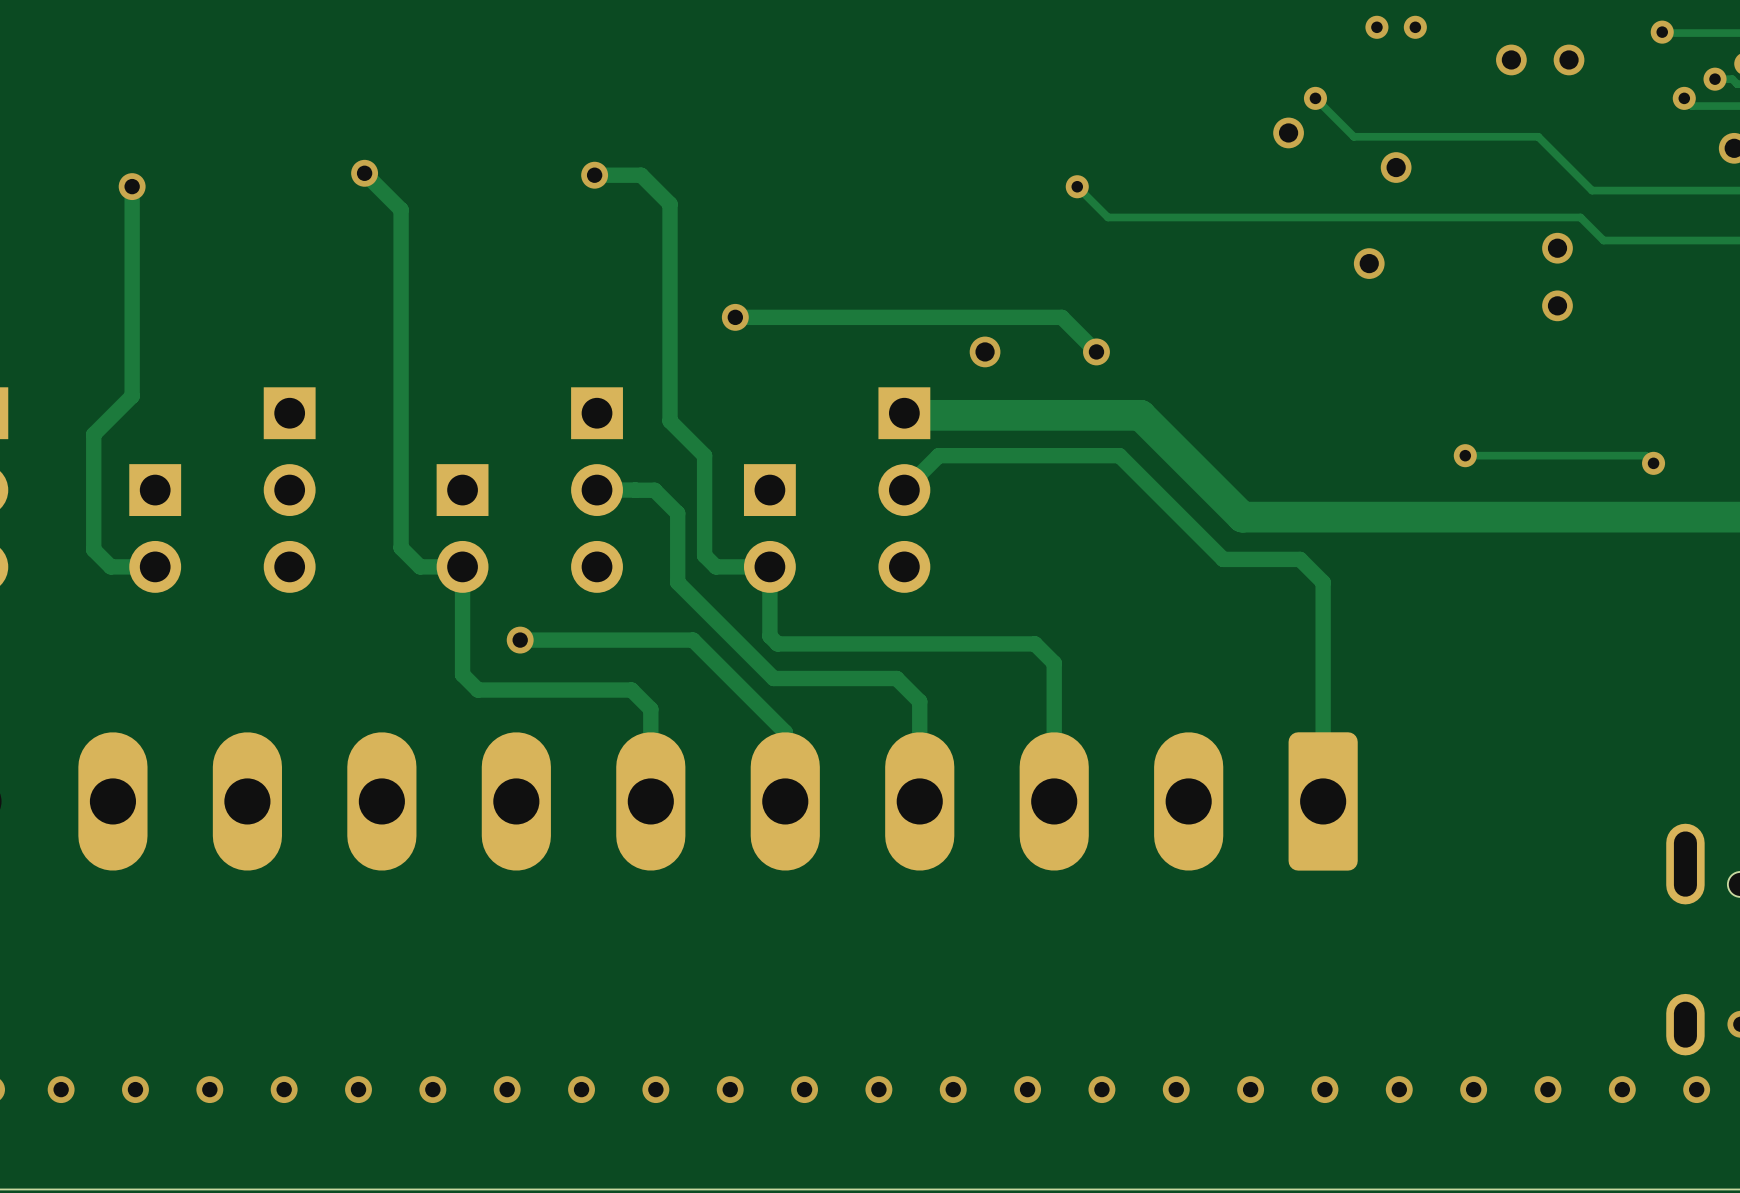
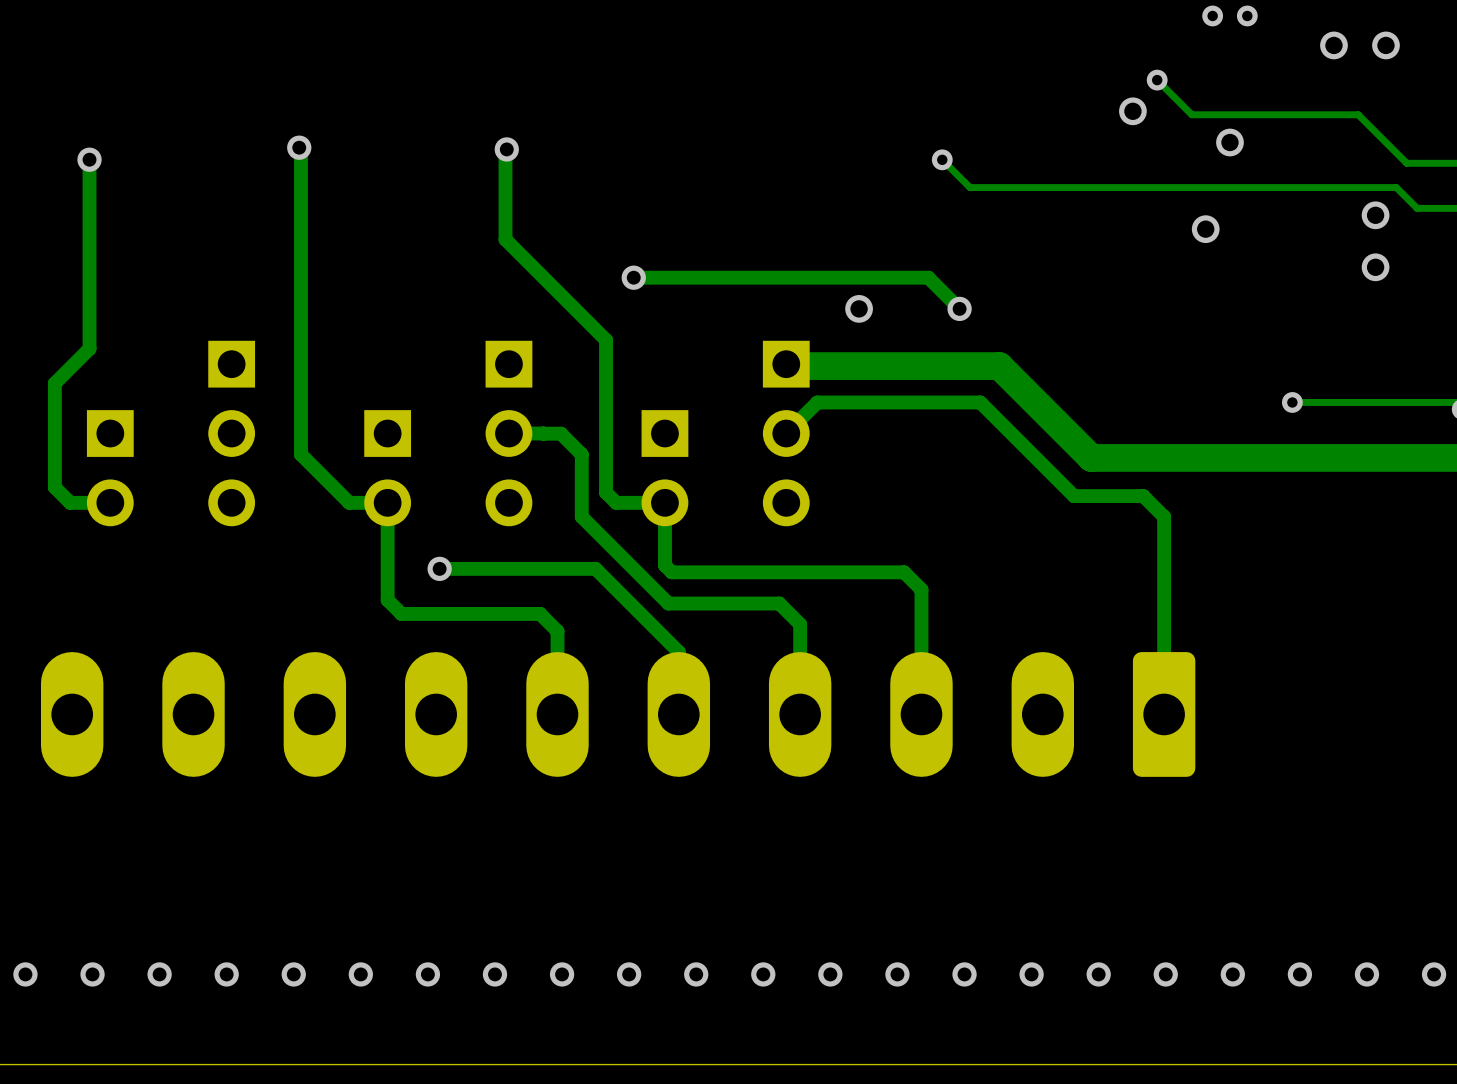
track: (366, 175) (401, 209) (401, 547) -> (300, 149) (300, 454) (332, 485)
track: (594, 175) (641, 175) (670, 204) (670, 421) (704, 455) -> (506, 149) (505, 239) (606, 340) (606, 402)

